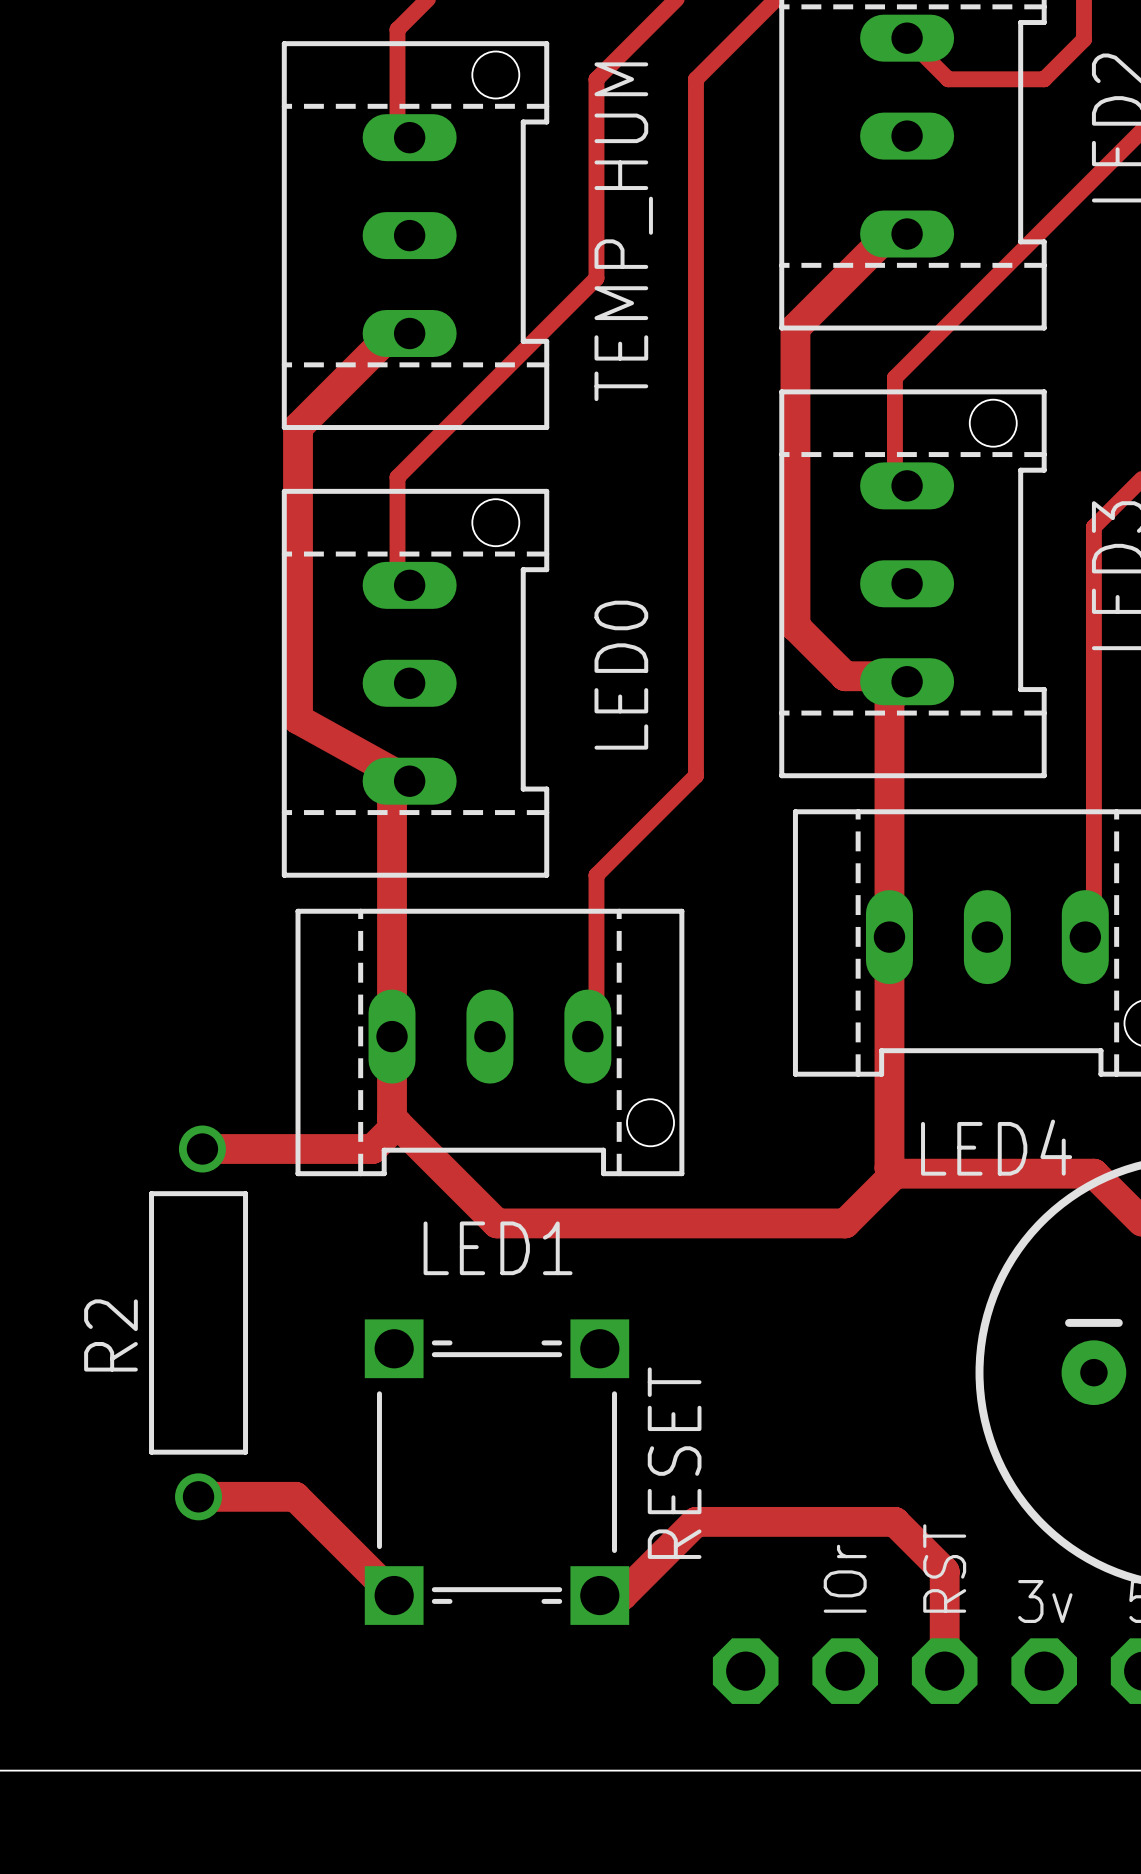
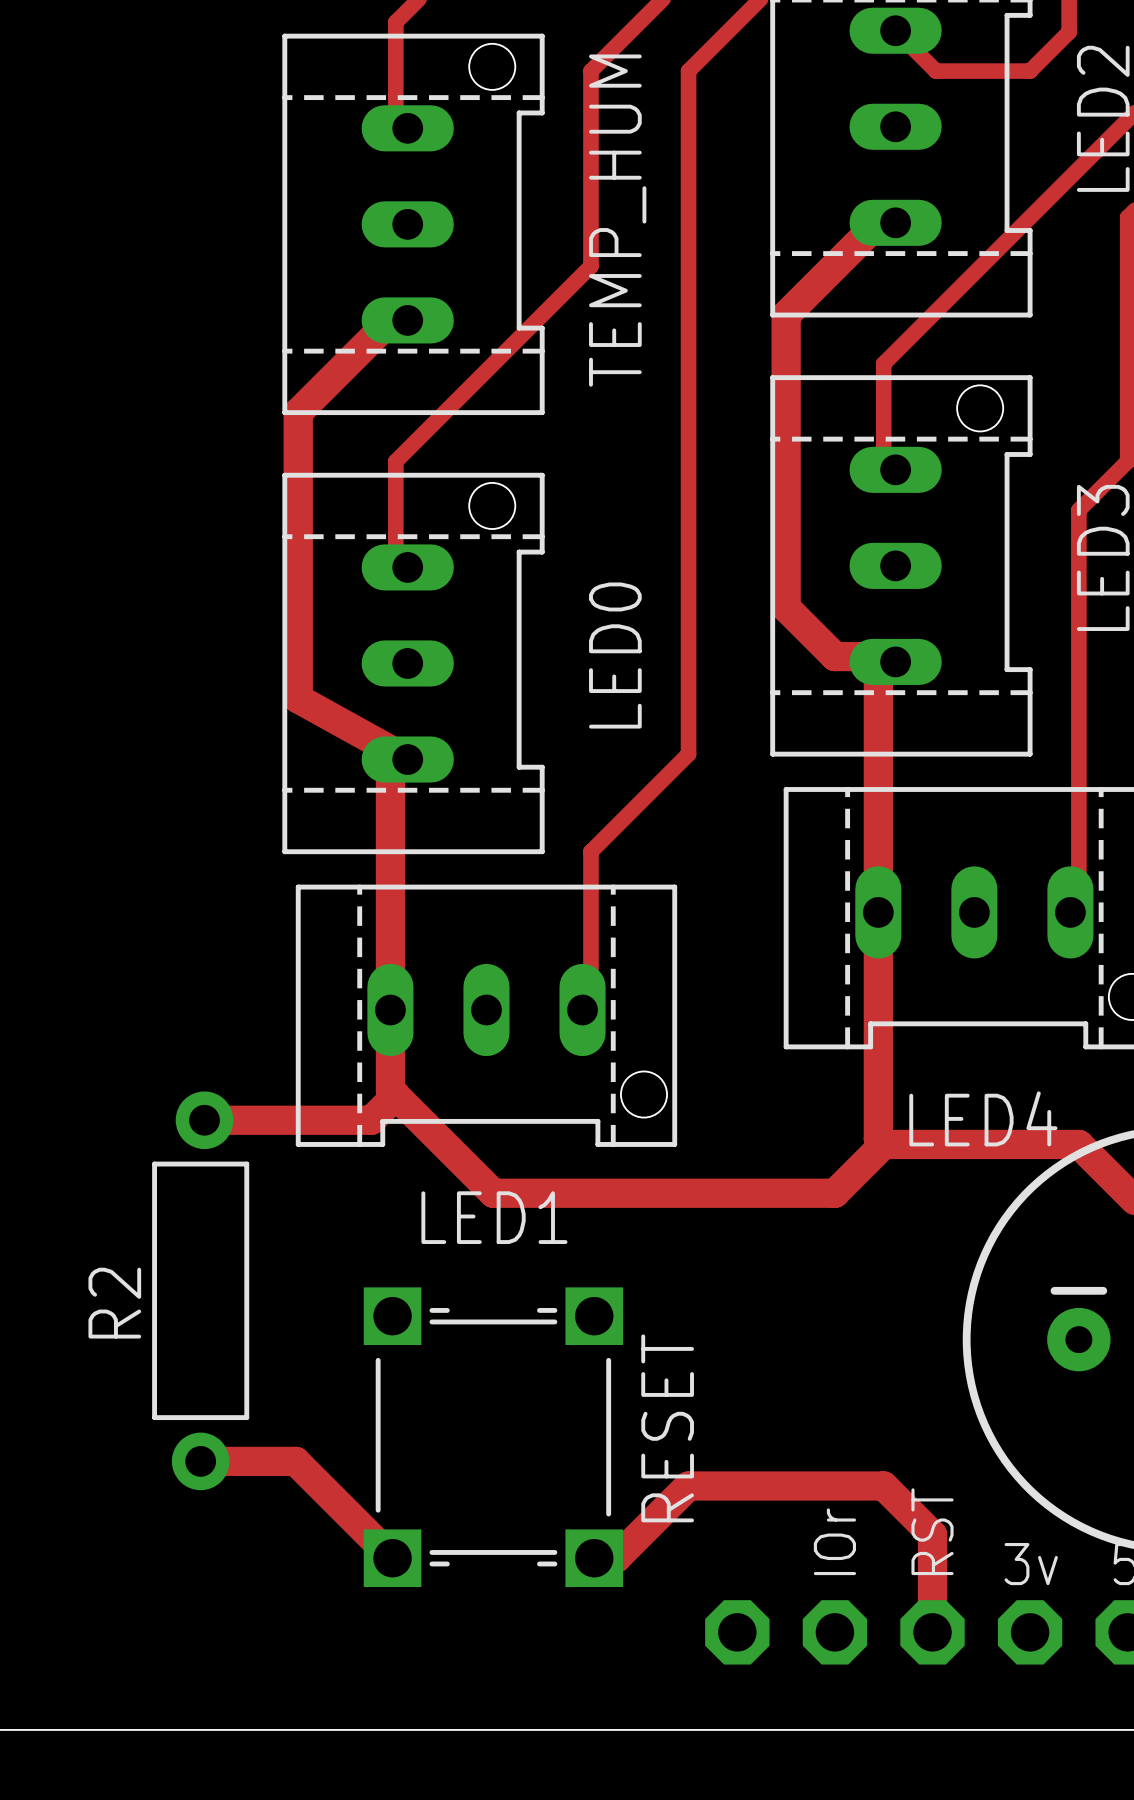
R2 footprint: [149, 1125, 249, 1521] -> [152, 1091, 250, 1491]

